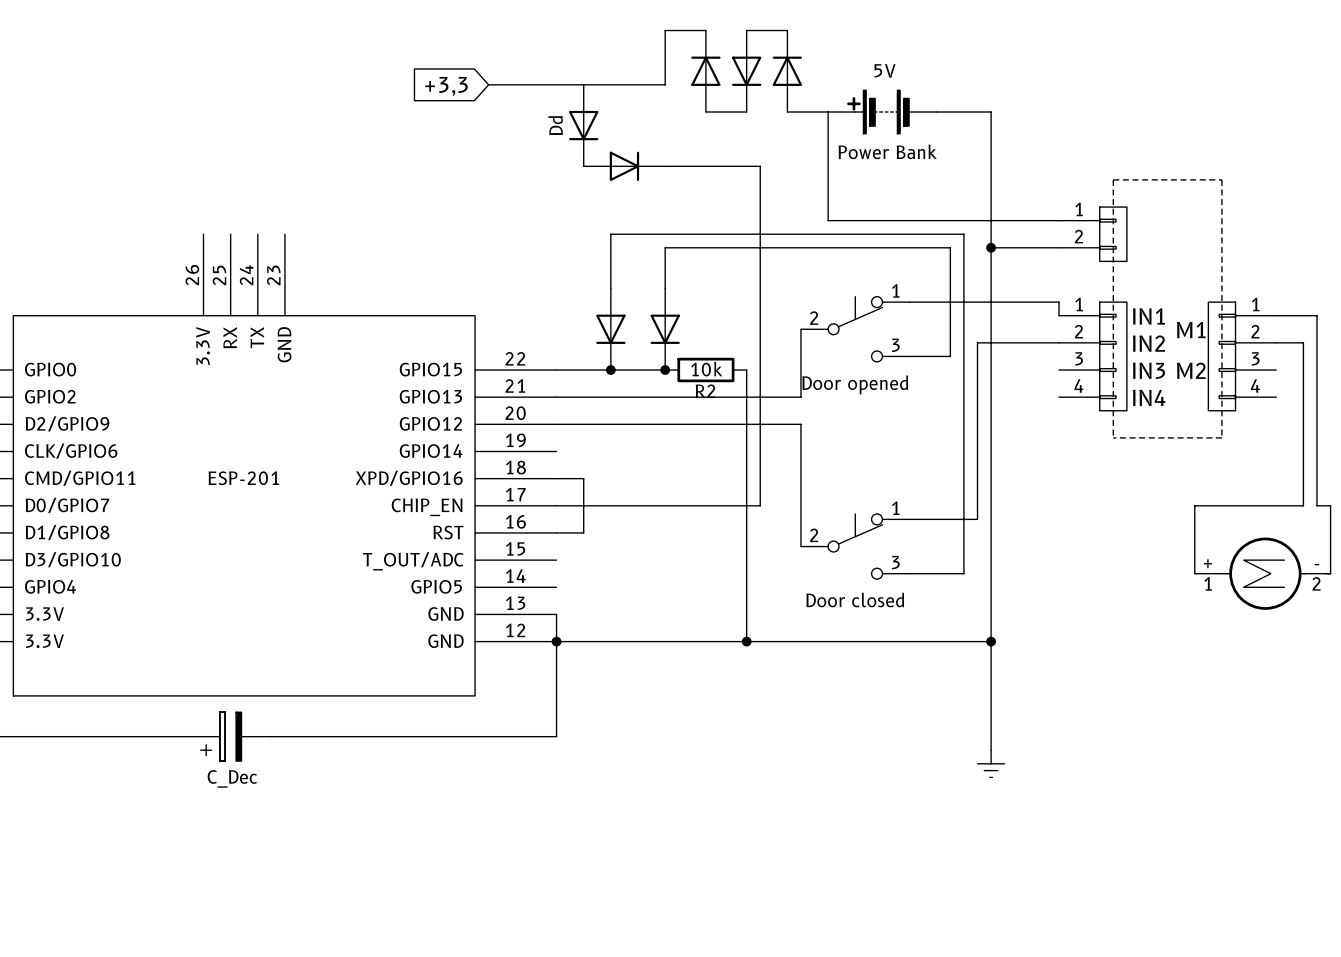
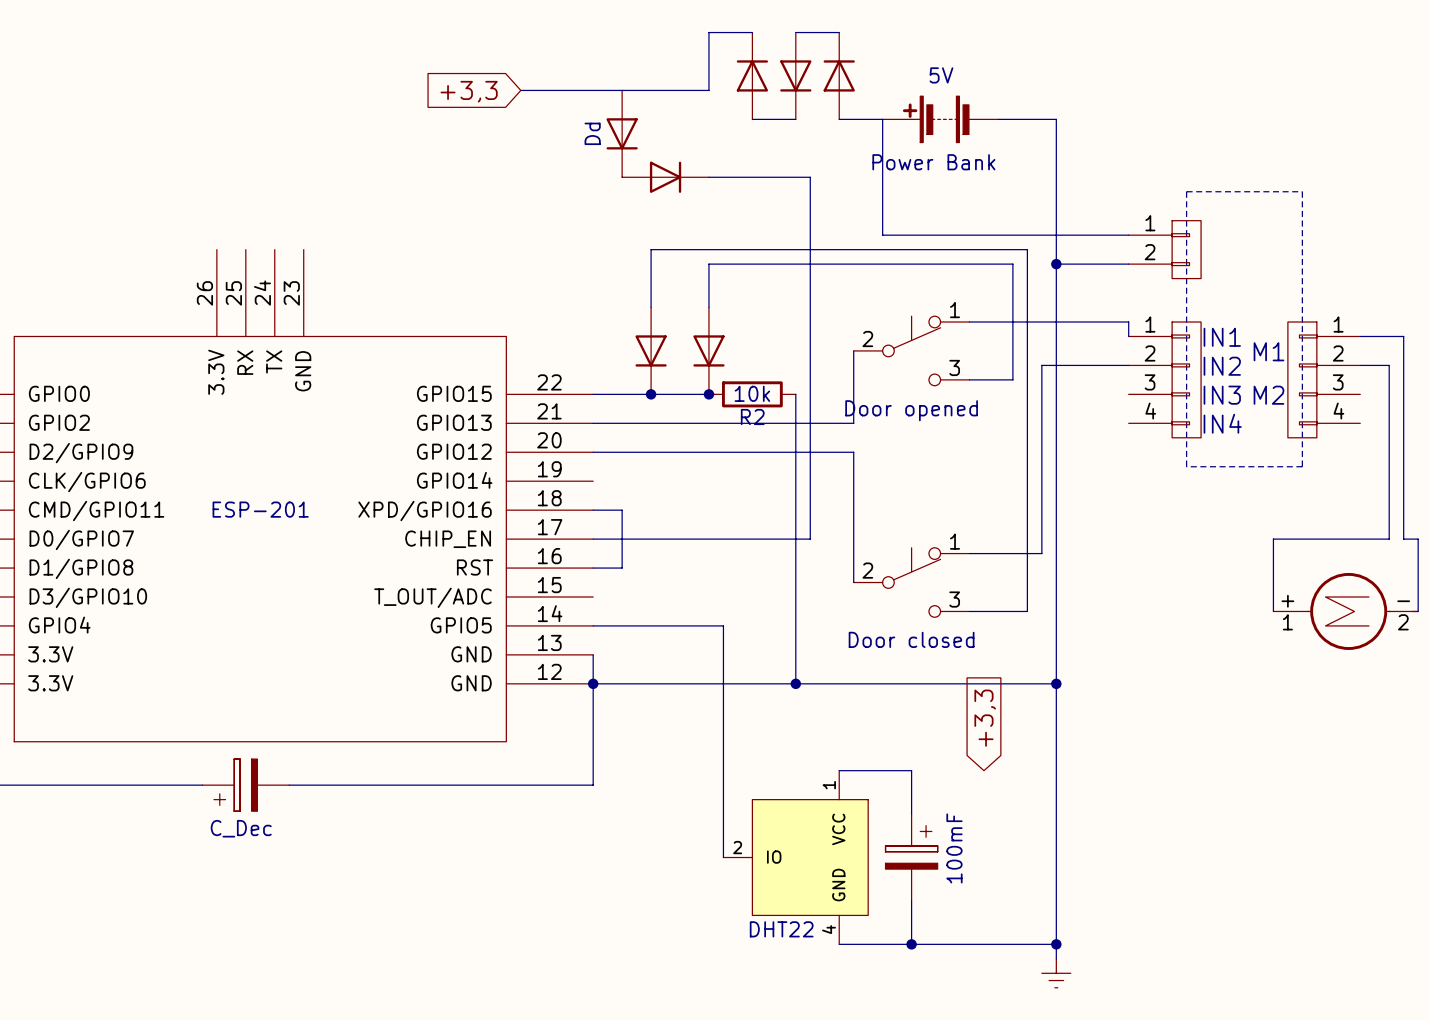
wire: none -> (593, 625) (723, 625) (723, 857)
global label: none -> +3,3 (985, 718)
wire: none -> (839, 770) (911, 770) (911, 814)
wire: none -> (1056, 799) (1056, 958)
power symbol position: (991, 763) -> (1056, 973)
part: none -> DHT22 (795, 857)
part: none -> 100mF (911, 857)
wire: none -> (911, 900) (911, 944)
wire: none -> (839, 944) (1056, 944)
junction: none -> (911, 944)
junction: none -> (1056, 944)

